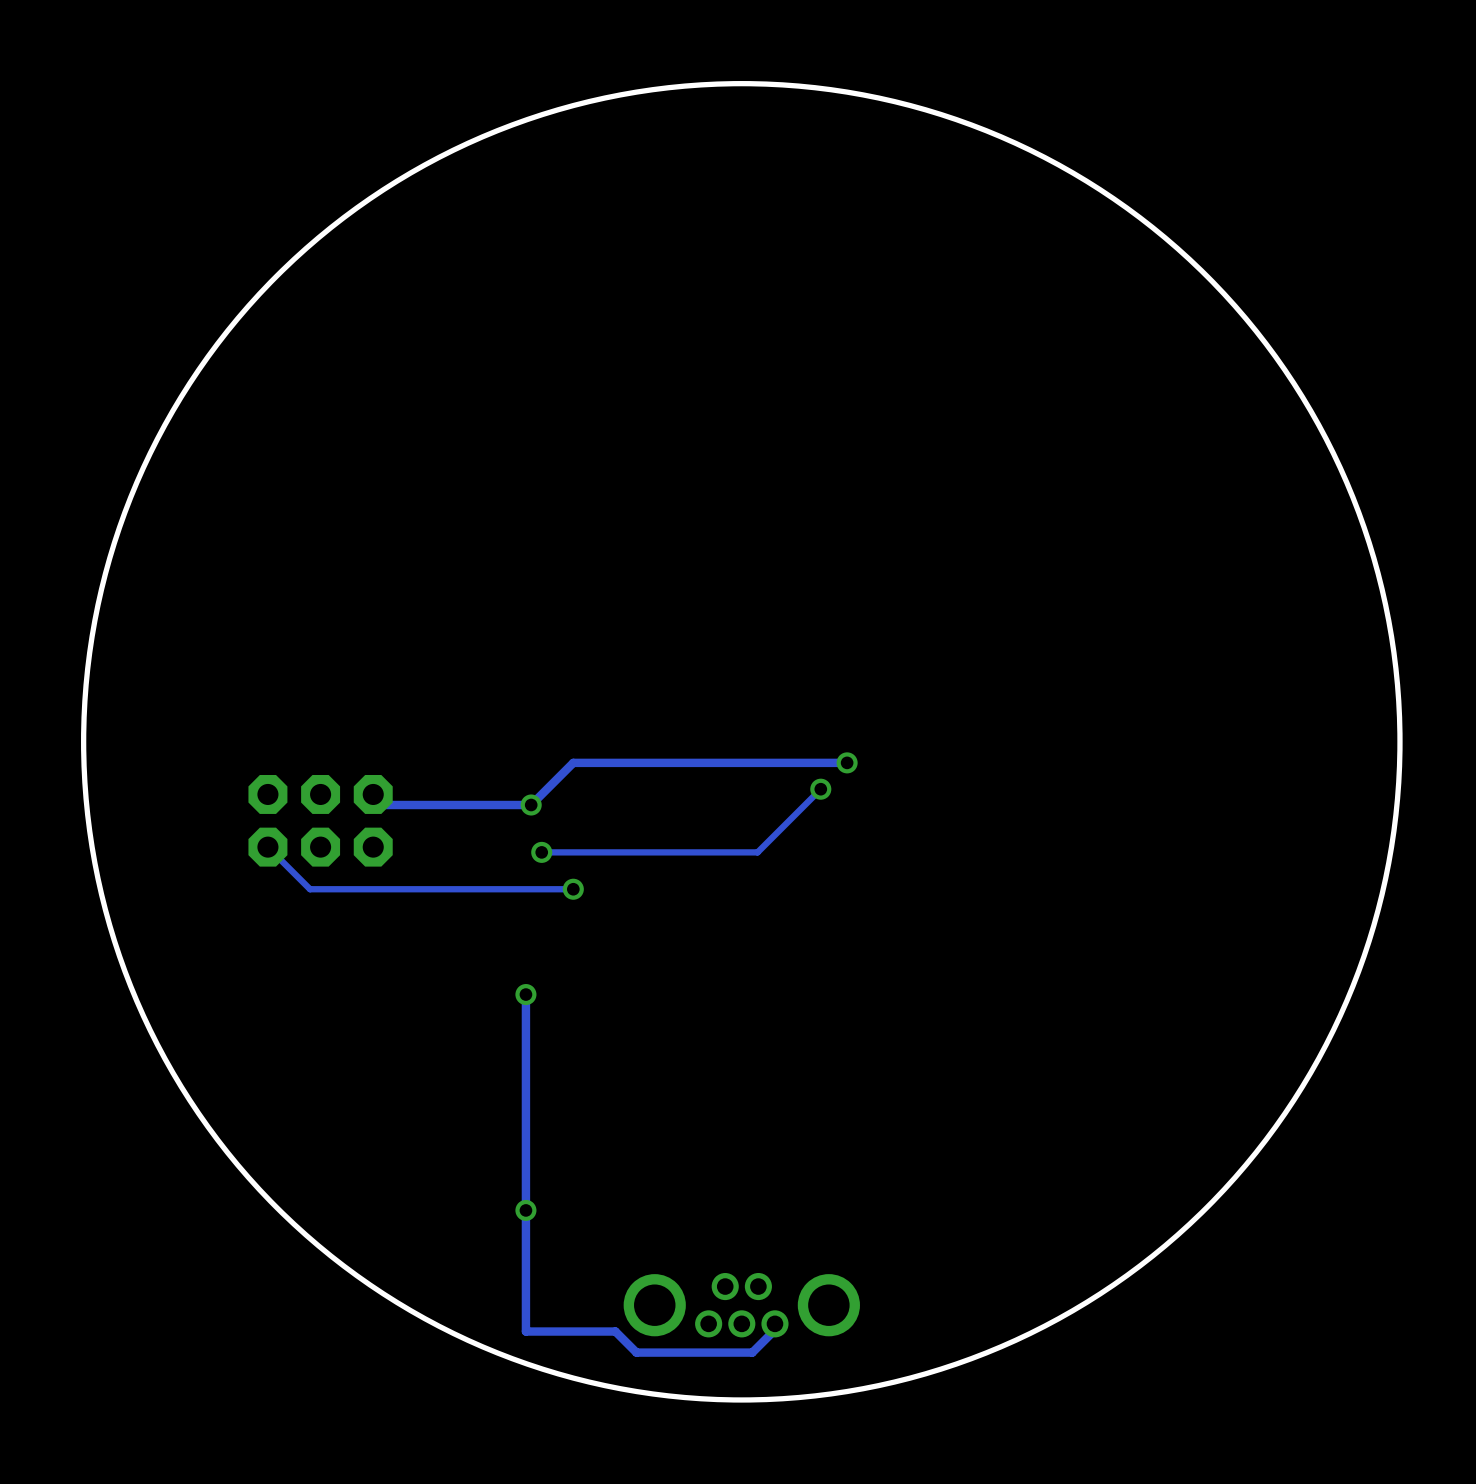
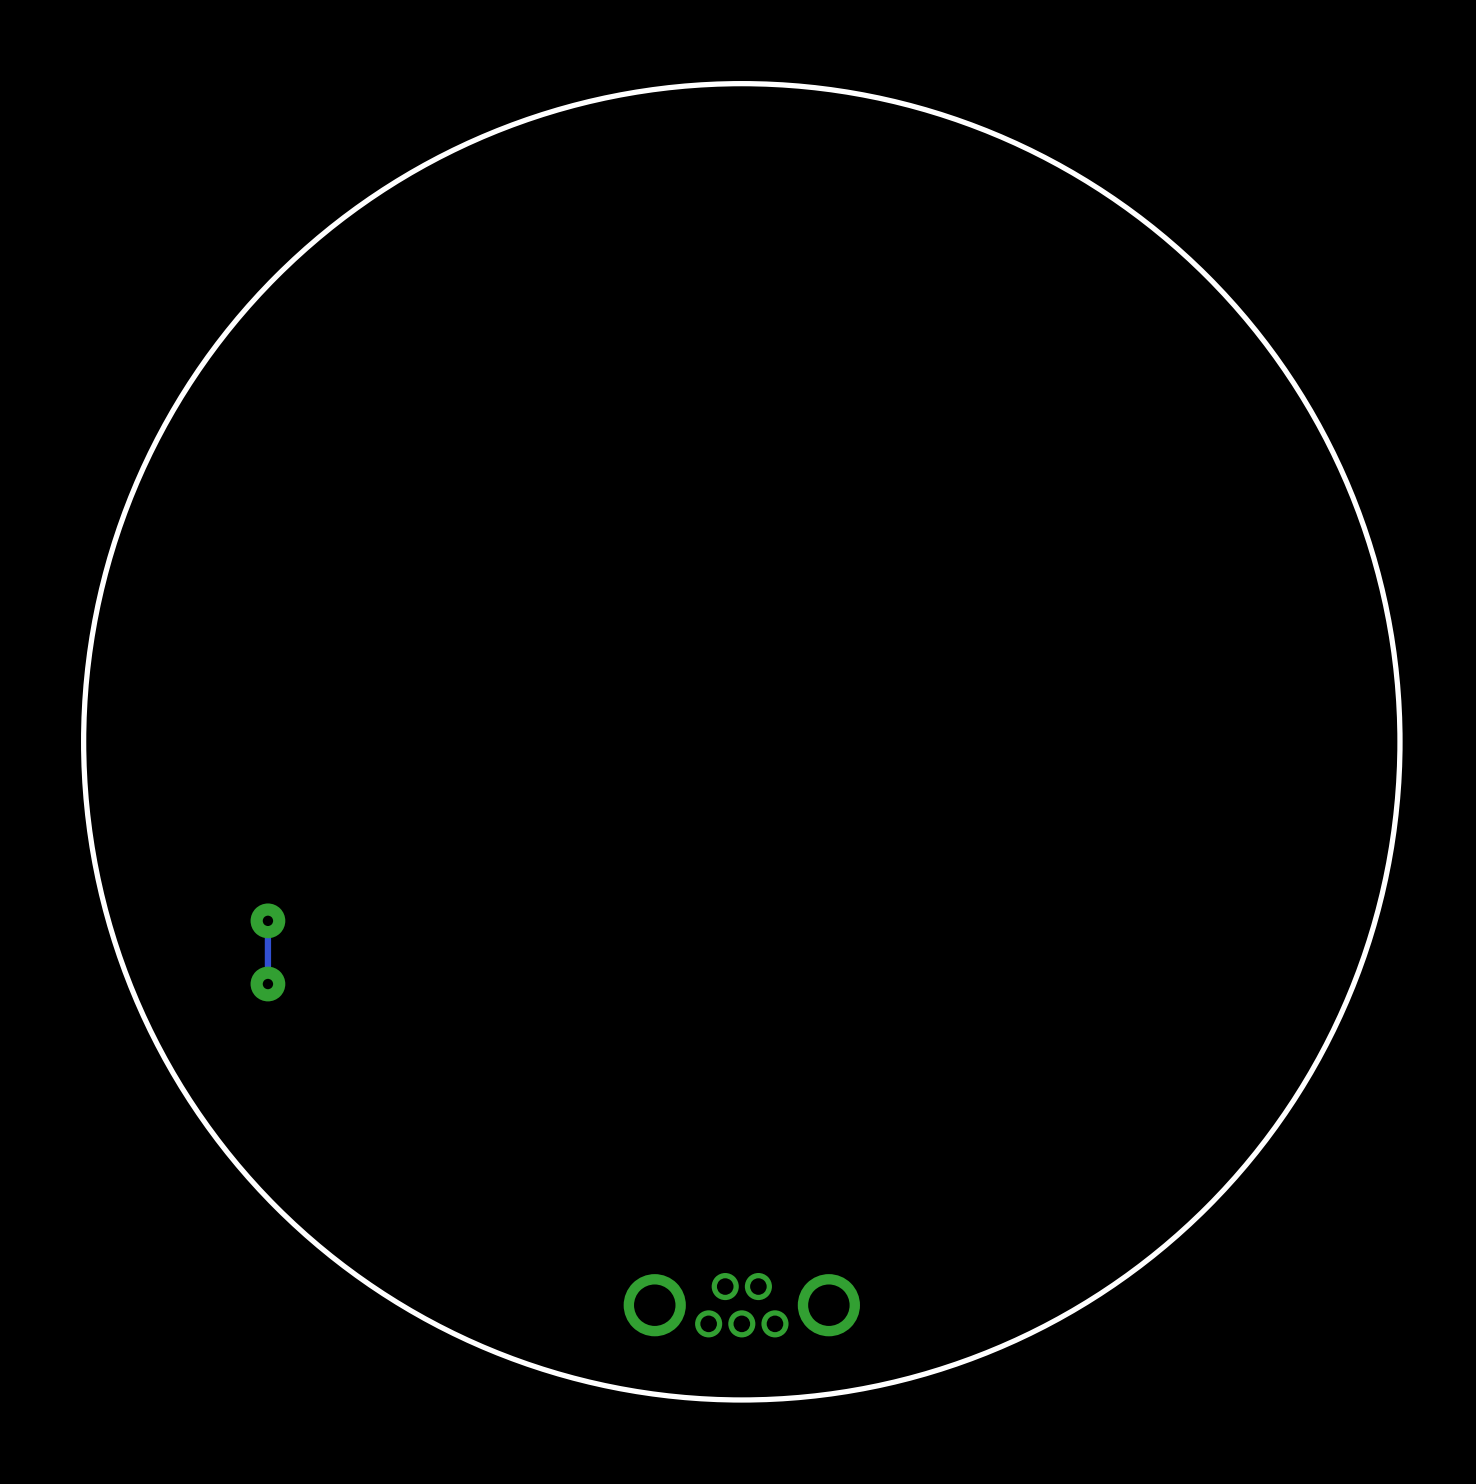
track: (847, 762) (573, 762) (531, 805) (383, 805) (373, 794) -> none
via: (847, 762) -> none
track: (820, 789) (757, 852) (541, 852) -> none
via: (820, 789) -> none
via: (531, 805) -> none
part: (320, 820) -> none
track: (267, 847) (310, 889) (573, 889) -> none
via: (541, 852) -> none
via: (573, 889) -> none
track: none -> (267, 920) (267, 984)
via: none -> (267, 920)
via: none -> (267, 984)
track: (525, 994) (525, 1331) (615, 1331) (636, 1352) (752, 1352) (778, 1326) (774, 1323) -> none
via: (525, 994) -> none
via: (525, 1210) -> none

